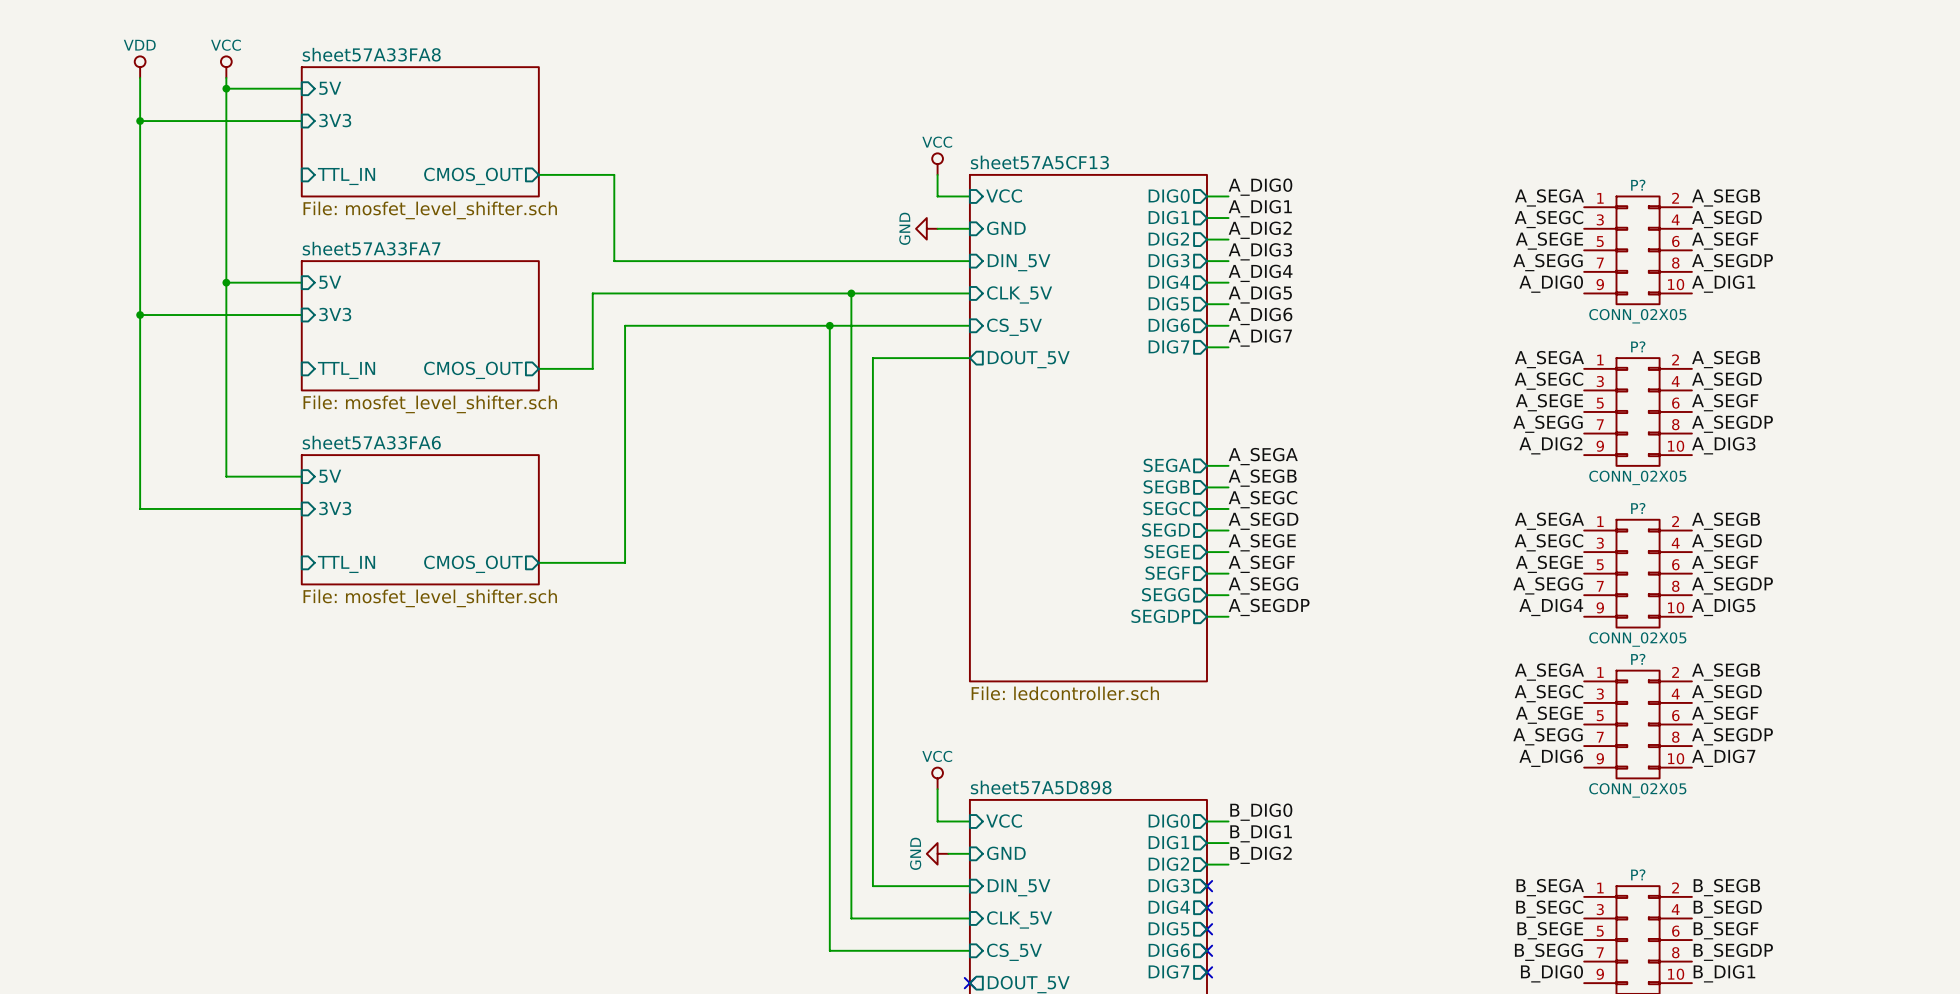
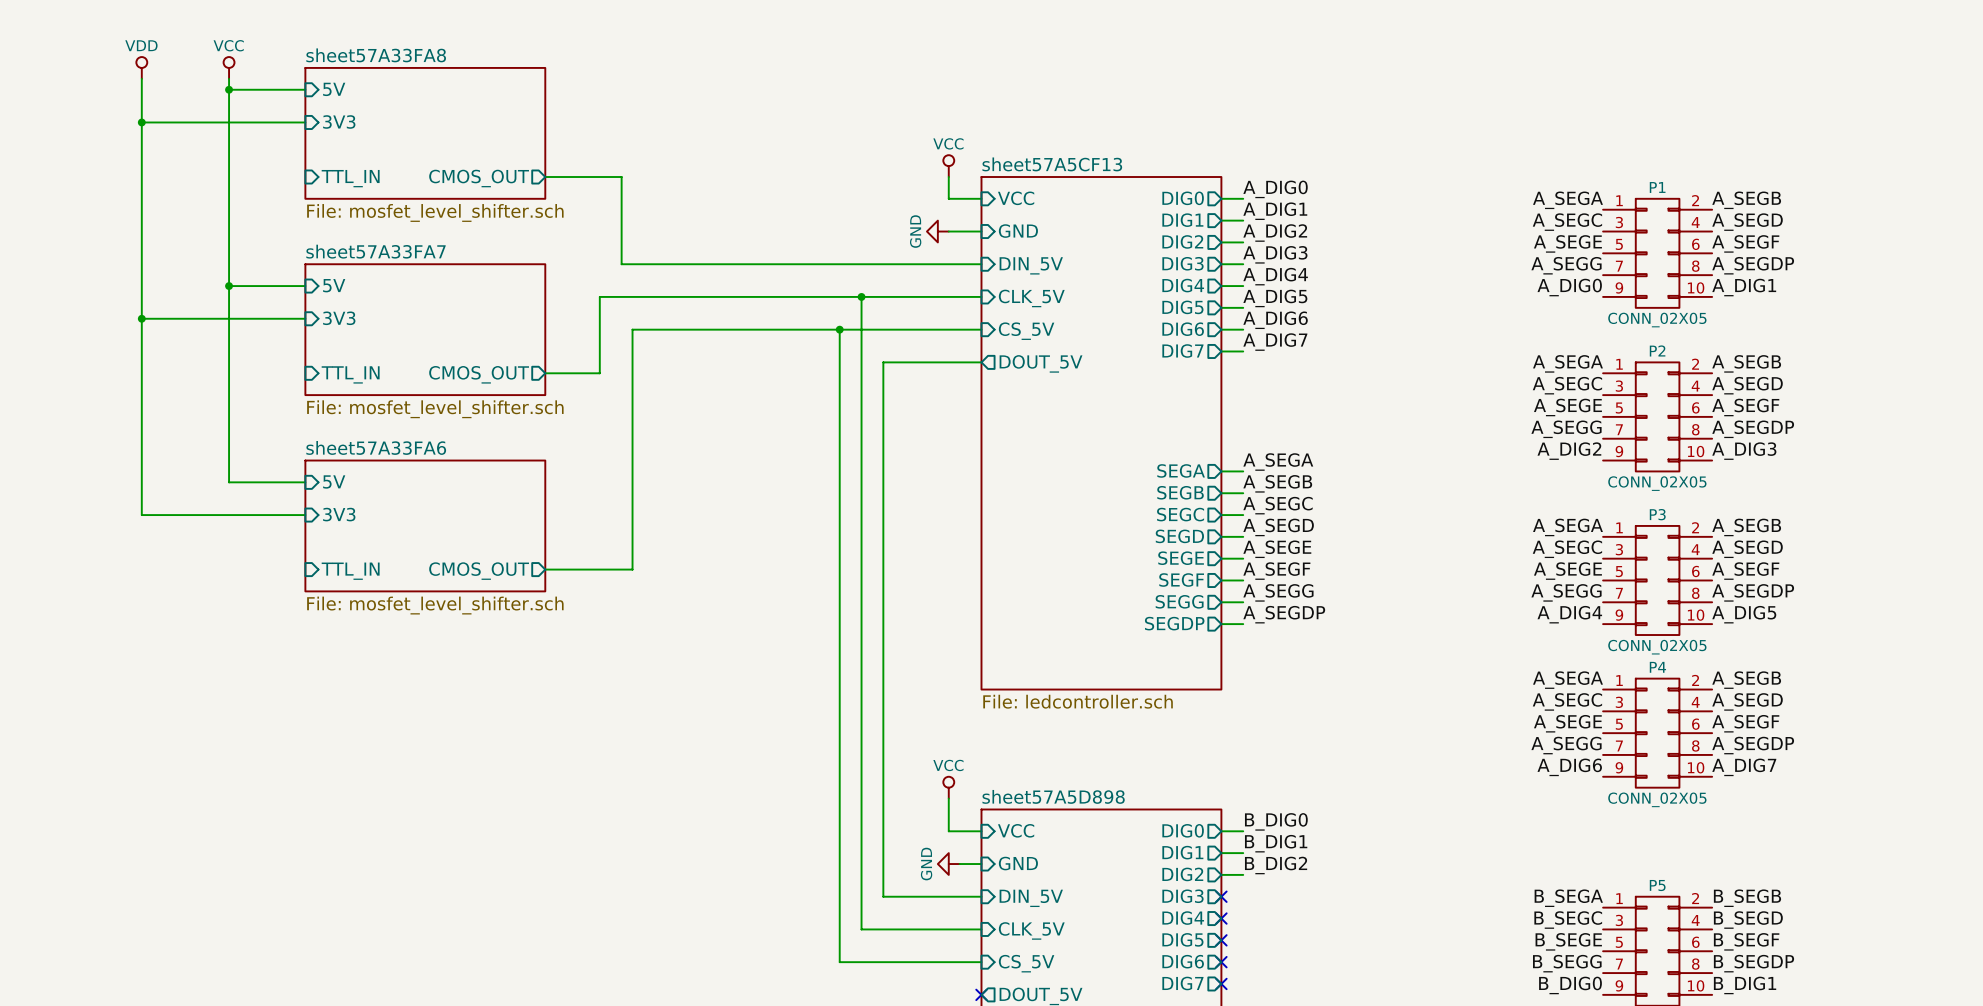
P? name: P? (1638, 185) -> P1 (1657, 187)
P? name: P? (1638, 346) -> P2 (1657, 350)
P? name: P? (1638, 508) -> P3 (1657, 514)
P? name: P? (1638, 659) -> P4 (1657, 667)
P? name: P? (1638, 874) -> P5 (1657, 885)

